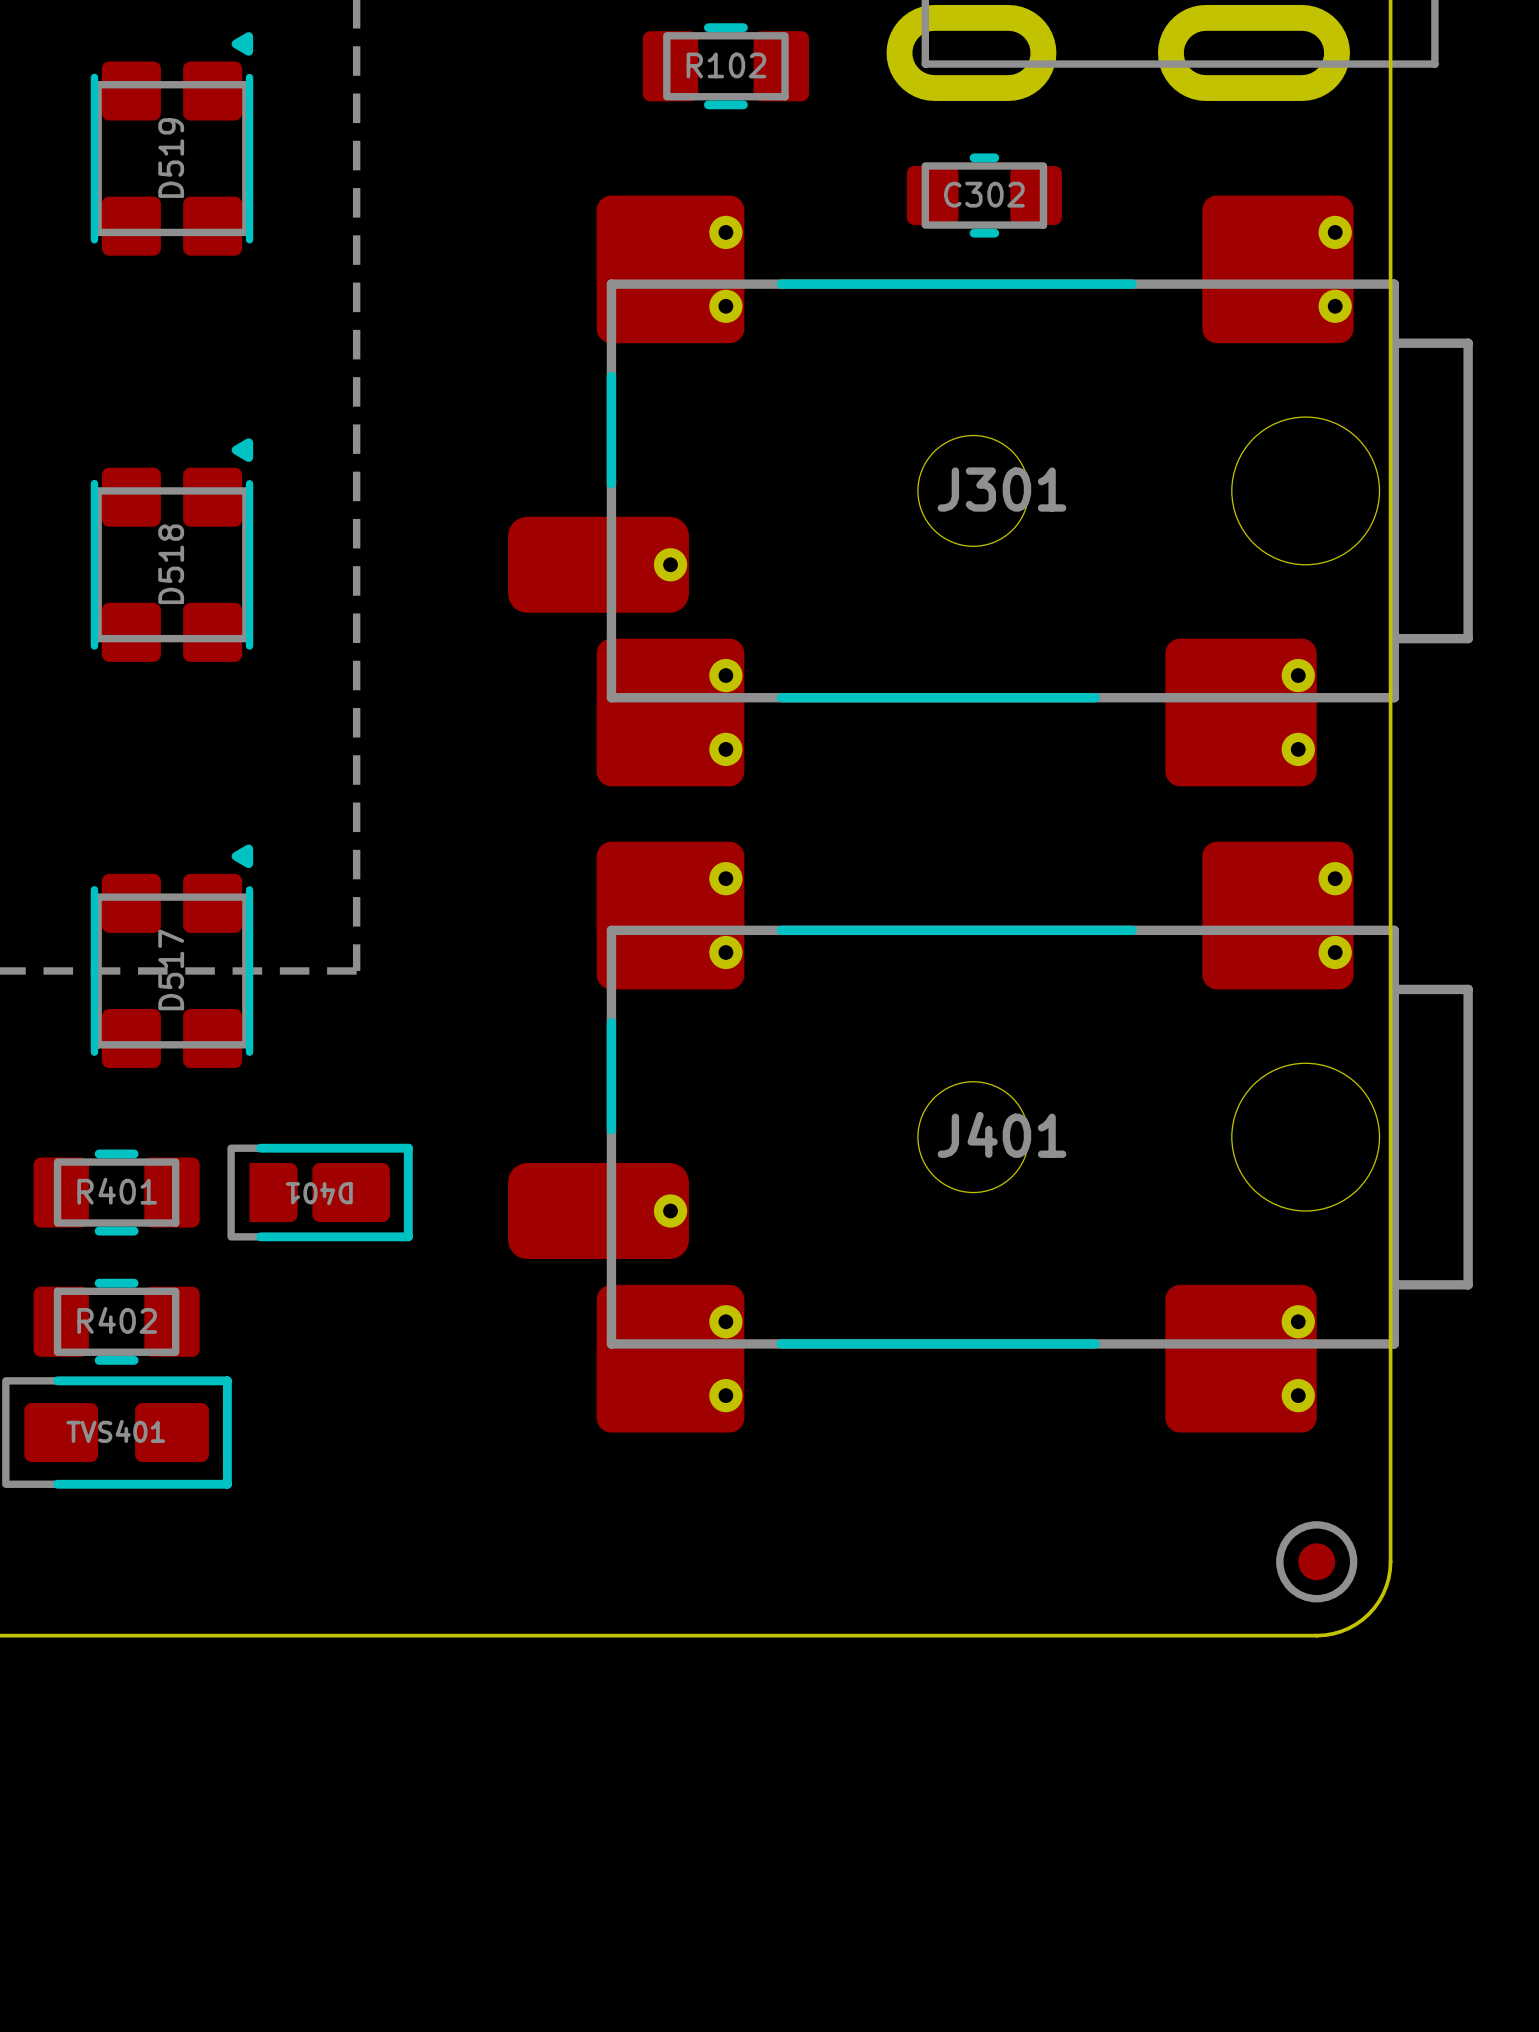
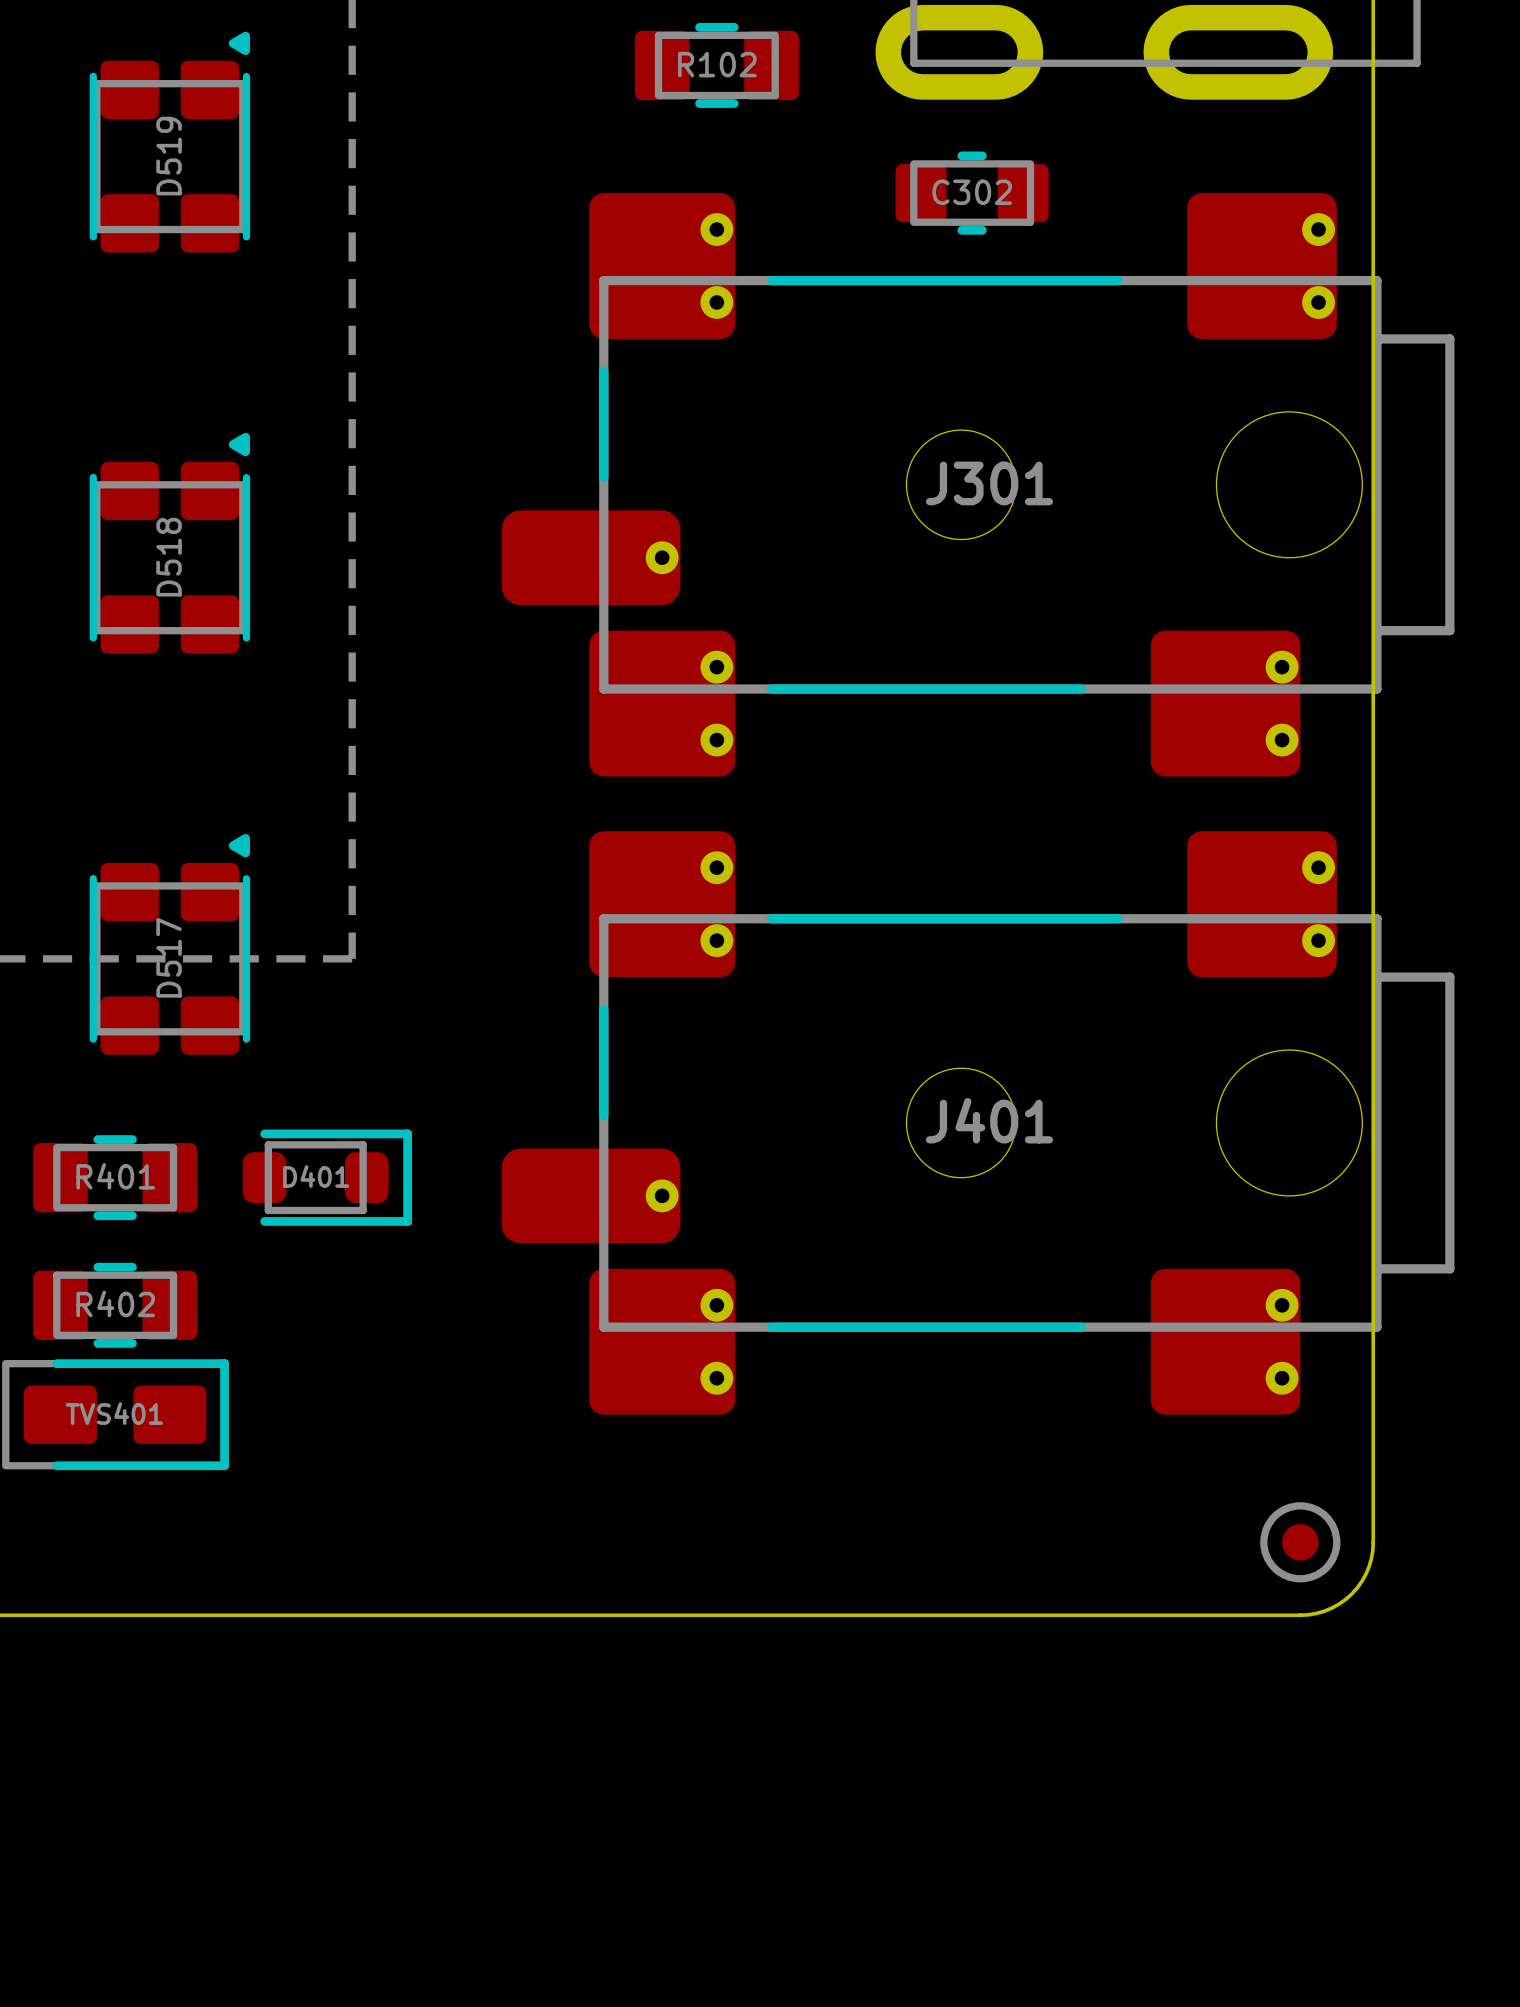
D401 footprint: [227, 1143, 413, 1242] -> [242, 1129, 413, 1226]
D401 name rotation: 0° (319, 1193) -> 180° (316, 1176)

